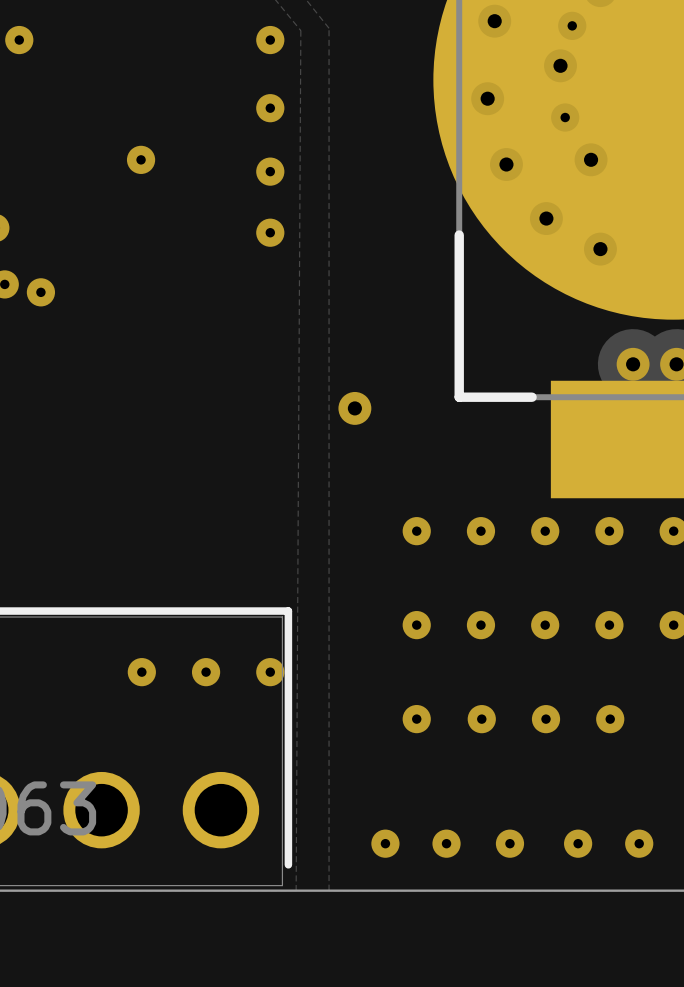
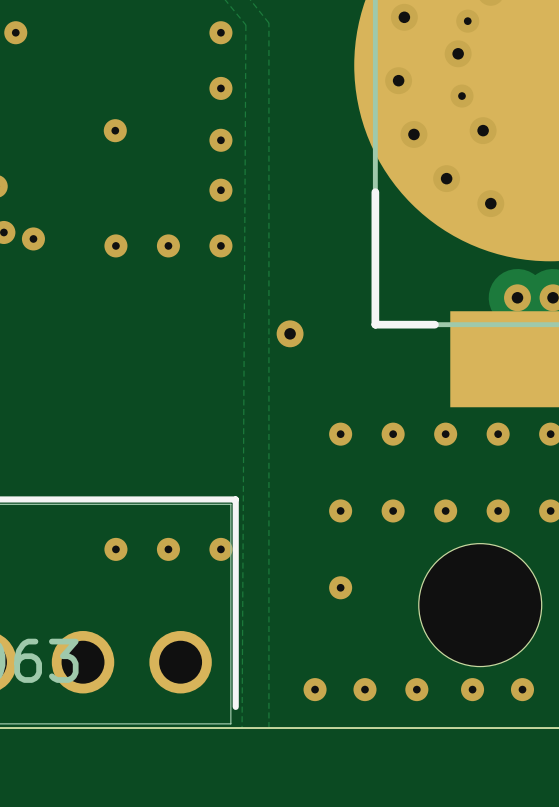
via: none -> (115, 245)
via: none -> (168, 245)
via: none -> (220, 245)
via: (481, 719) -> none
via: (546, 719) -> none
via: (610, 719) -> none
part: none -> (480, 605)

